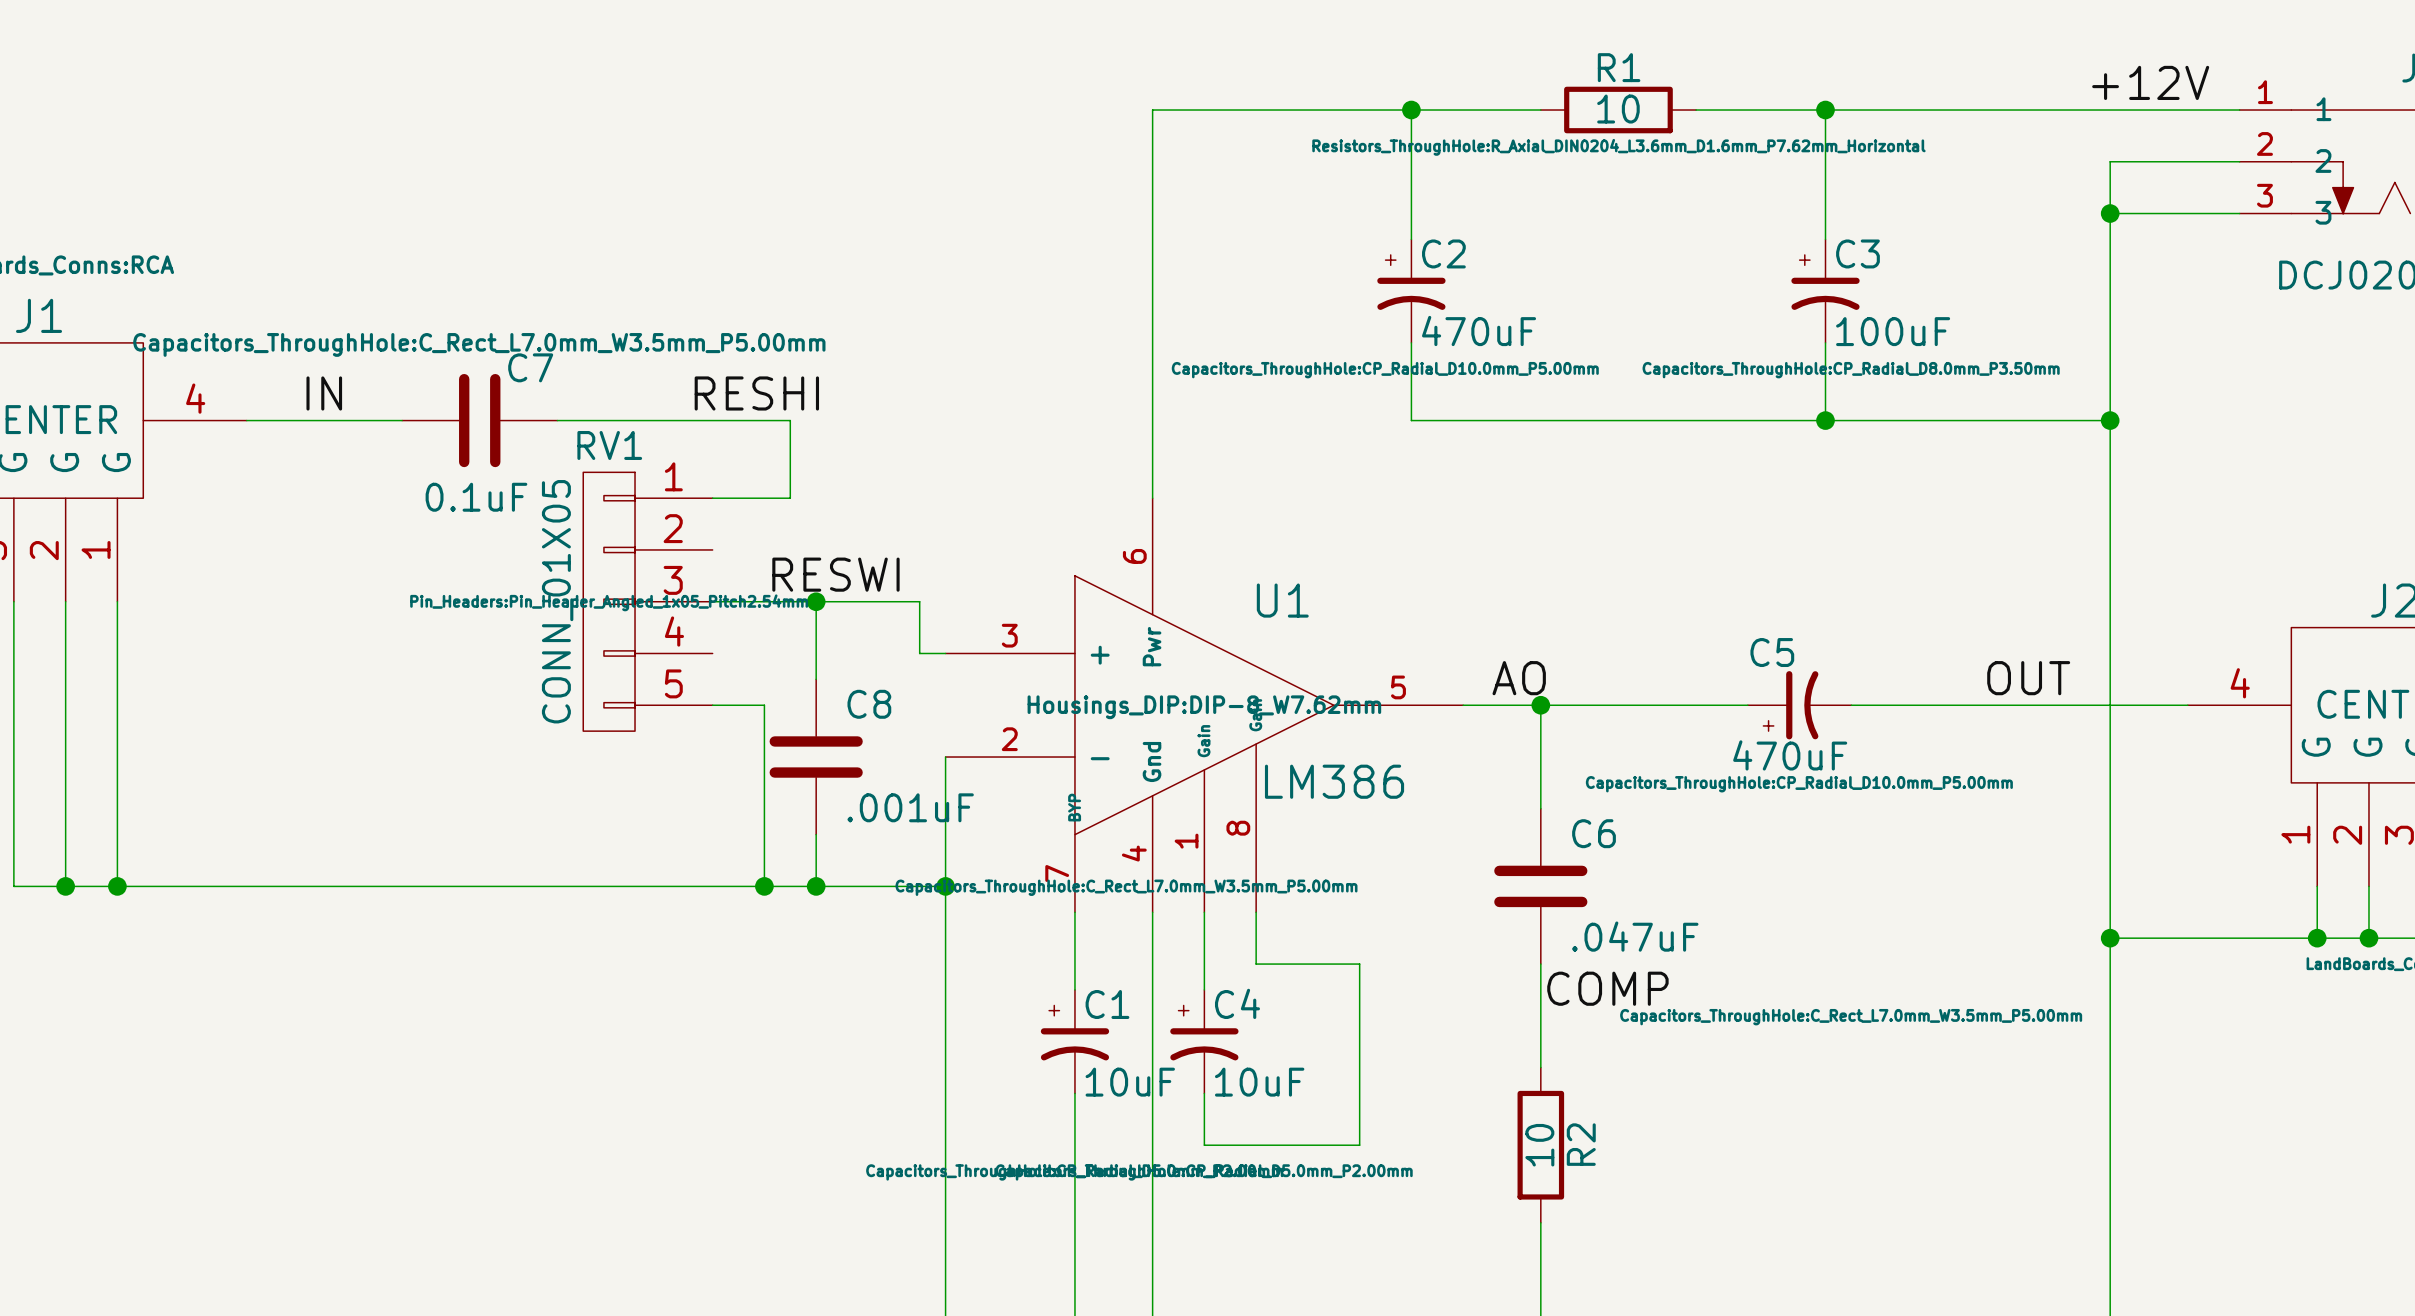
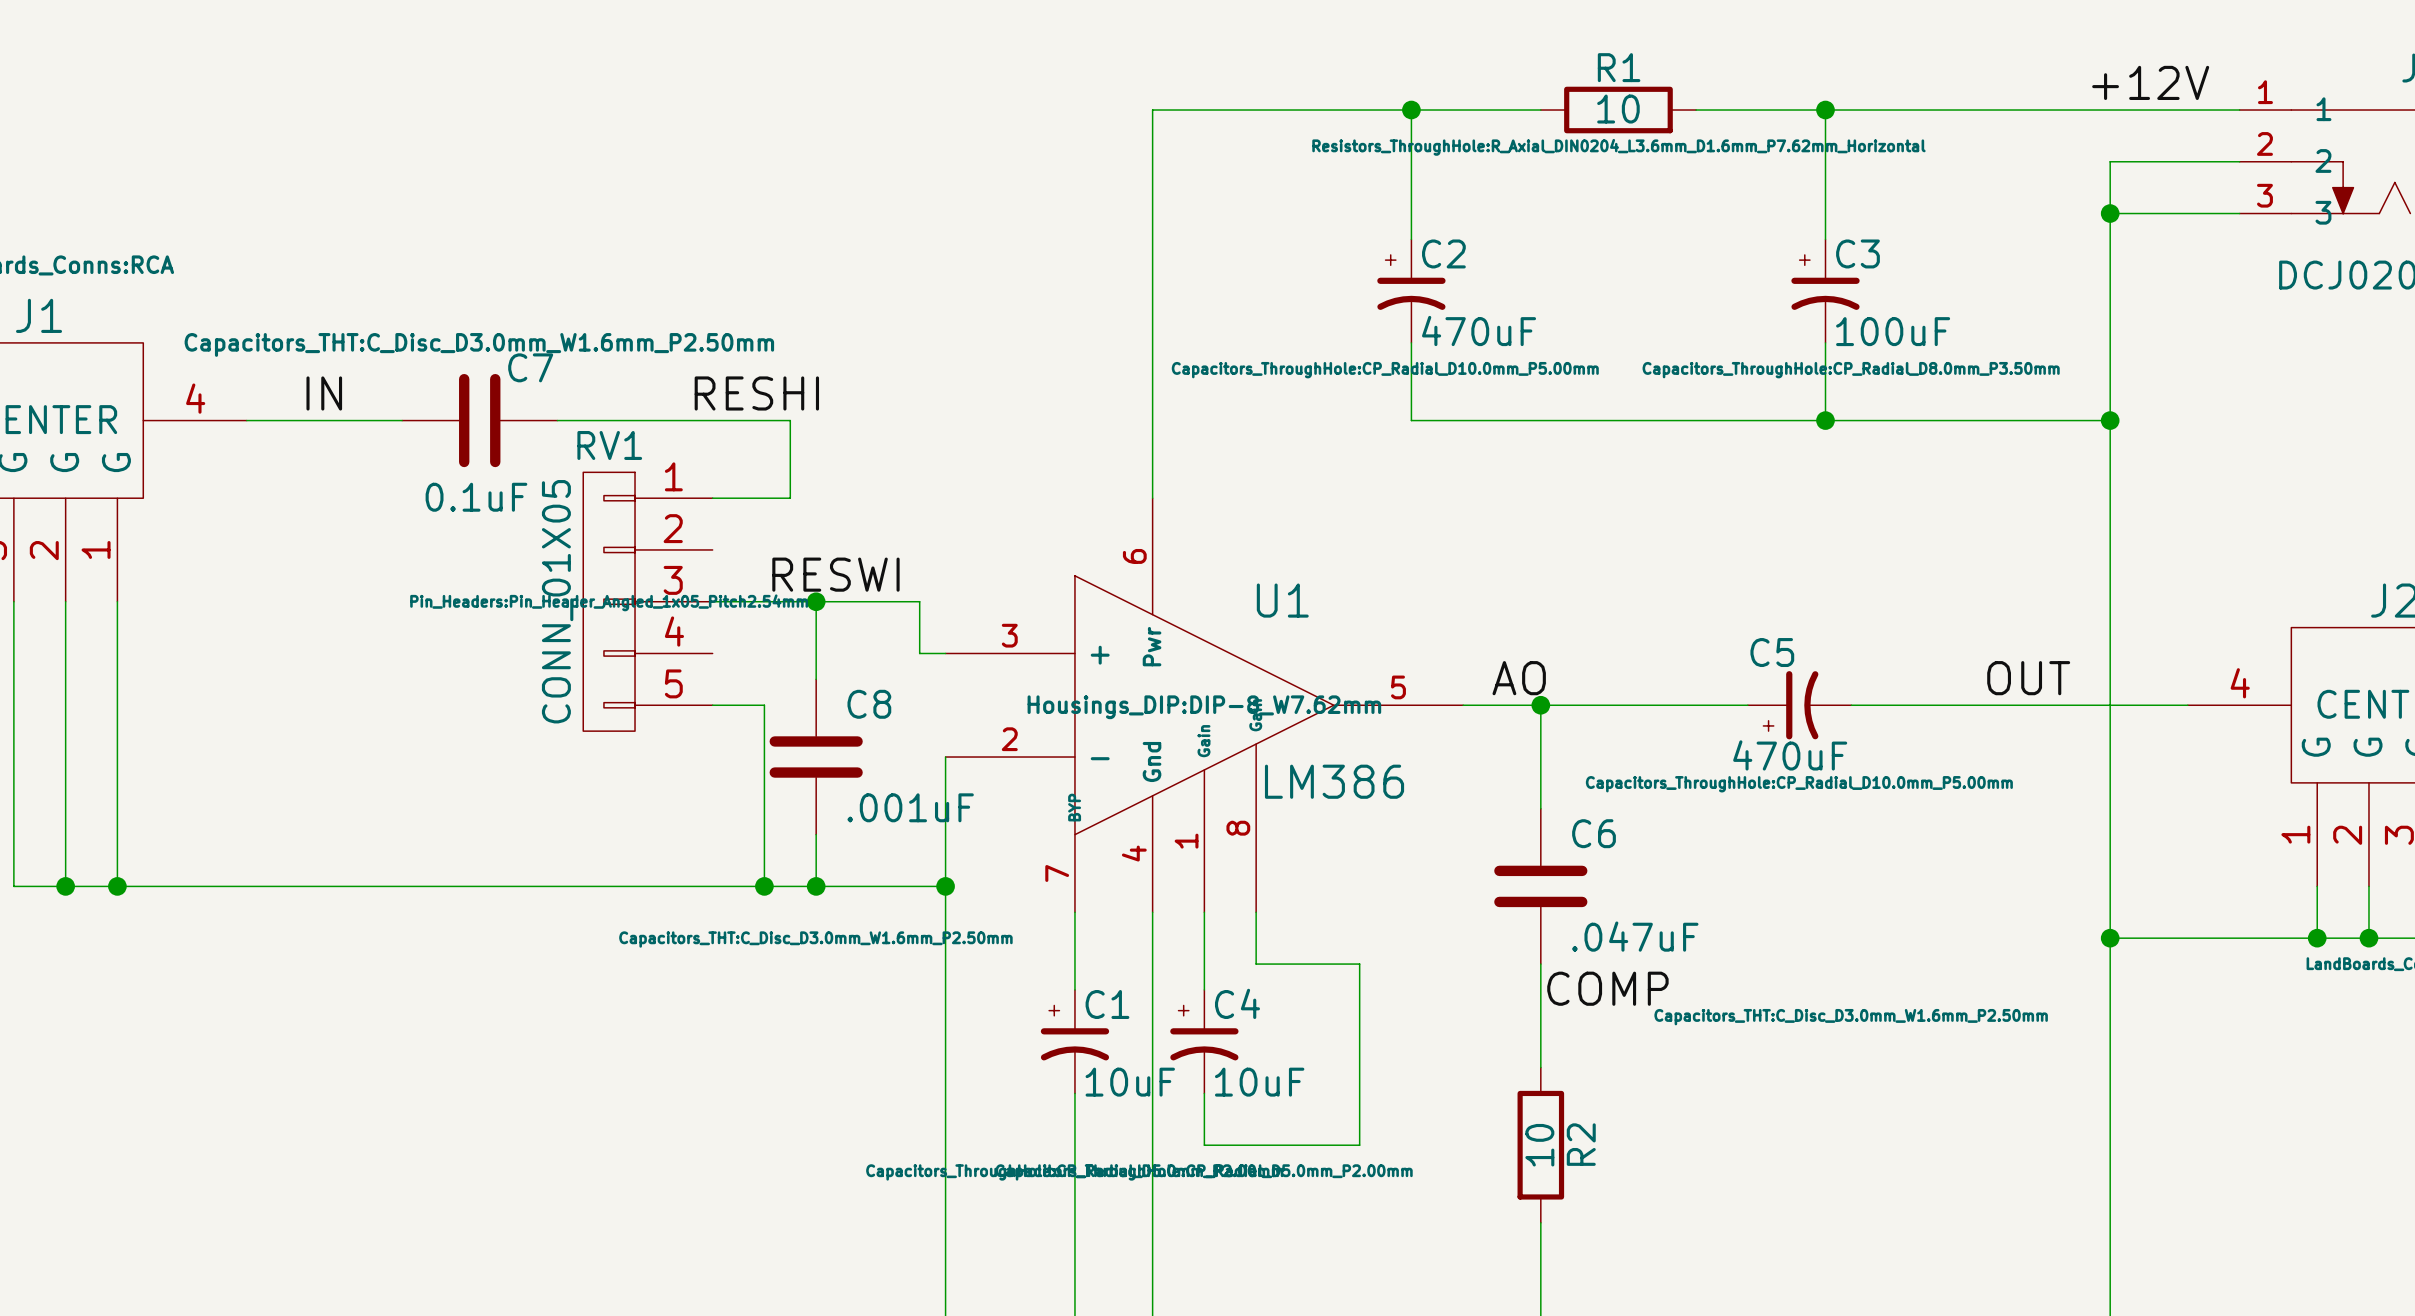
C7 text: Capacitors_ThroughHole:C_Rect_L7.0mm_W3.5mm_P5.00mm (479, 344) -> Capacitors_THT:C_Disc_D3.0mm_W1.6mm_P2.50mm (479, 344)
C8 text: Capacitors_ThroughHole:C_Rect_L7.0mm_W3.5mm_P5.00mm (1126, 887) -> Capacitors_THT:C_Disc_D3.0mm_W1.6mm_P2.50mm (815, 939)
C6 text: Capacitors_ThroughHole:C_Rect_L7.0mm_W3.5mm_P5.00mm (1851, 1017) -> Capacitors_THT:C_Disc_D3.0mm_W1.6mm_P2.50mm (1851, 1017)

